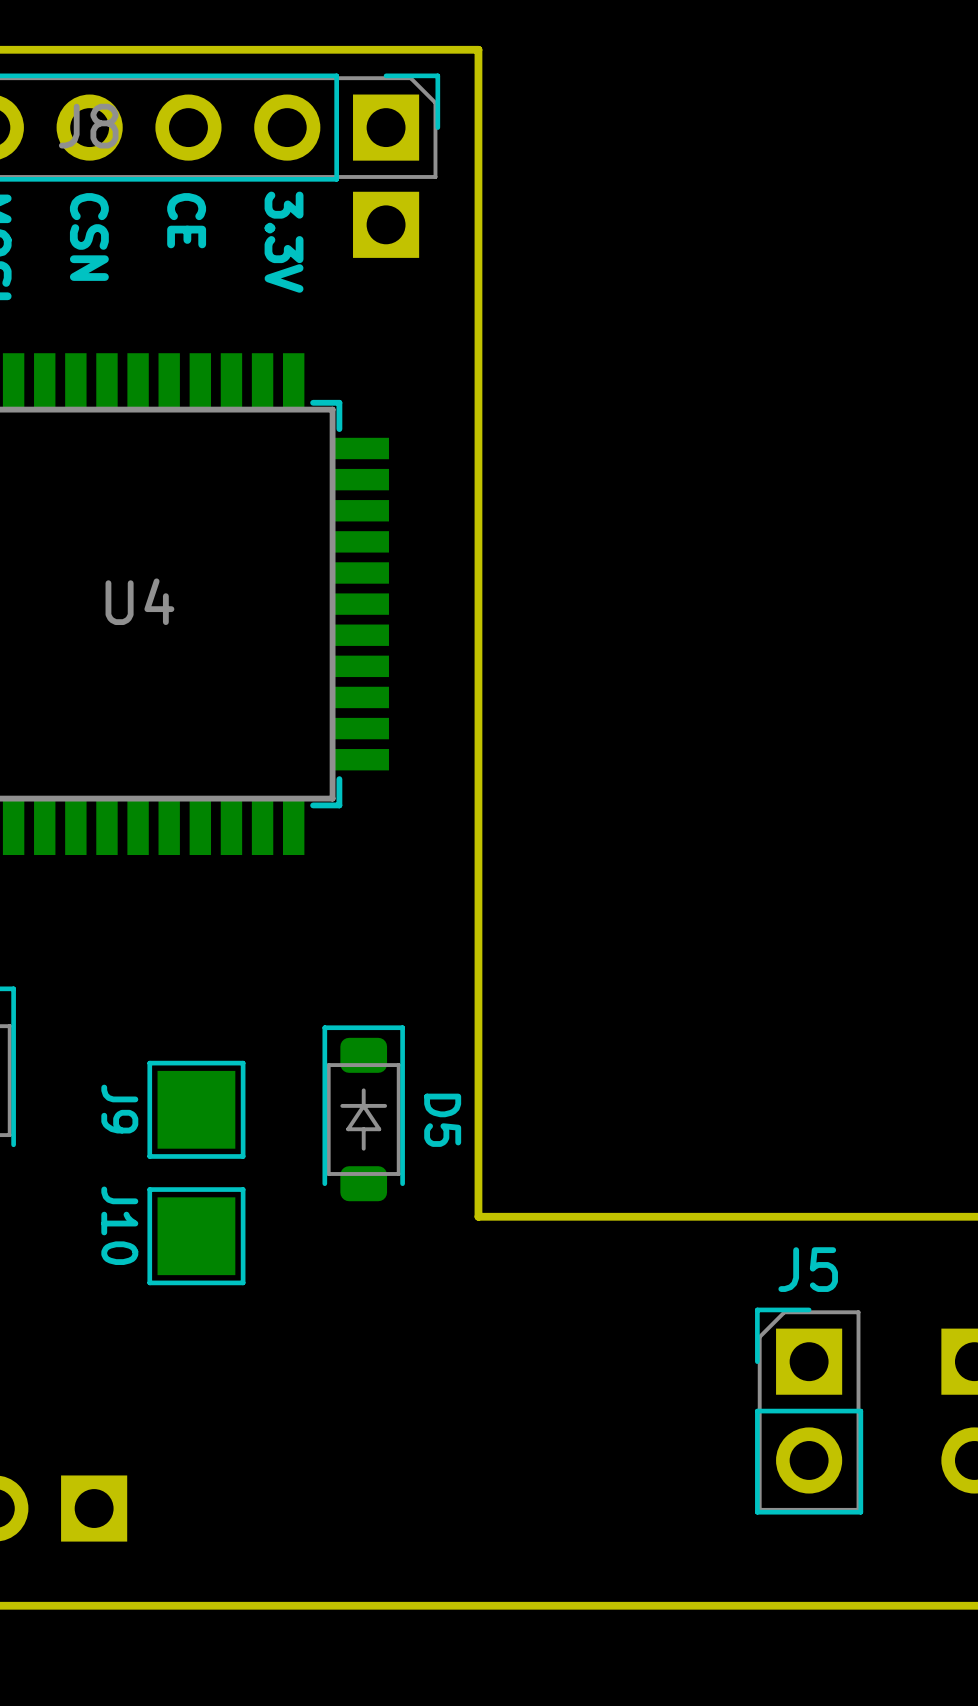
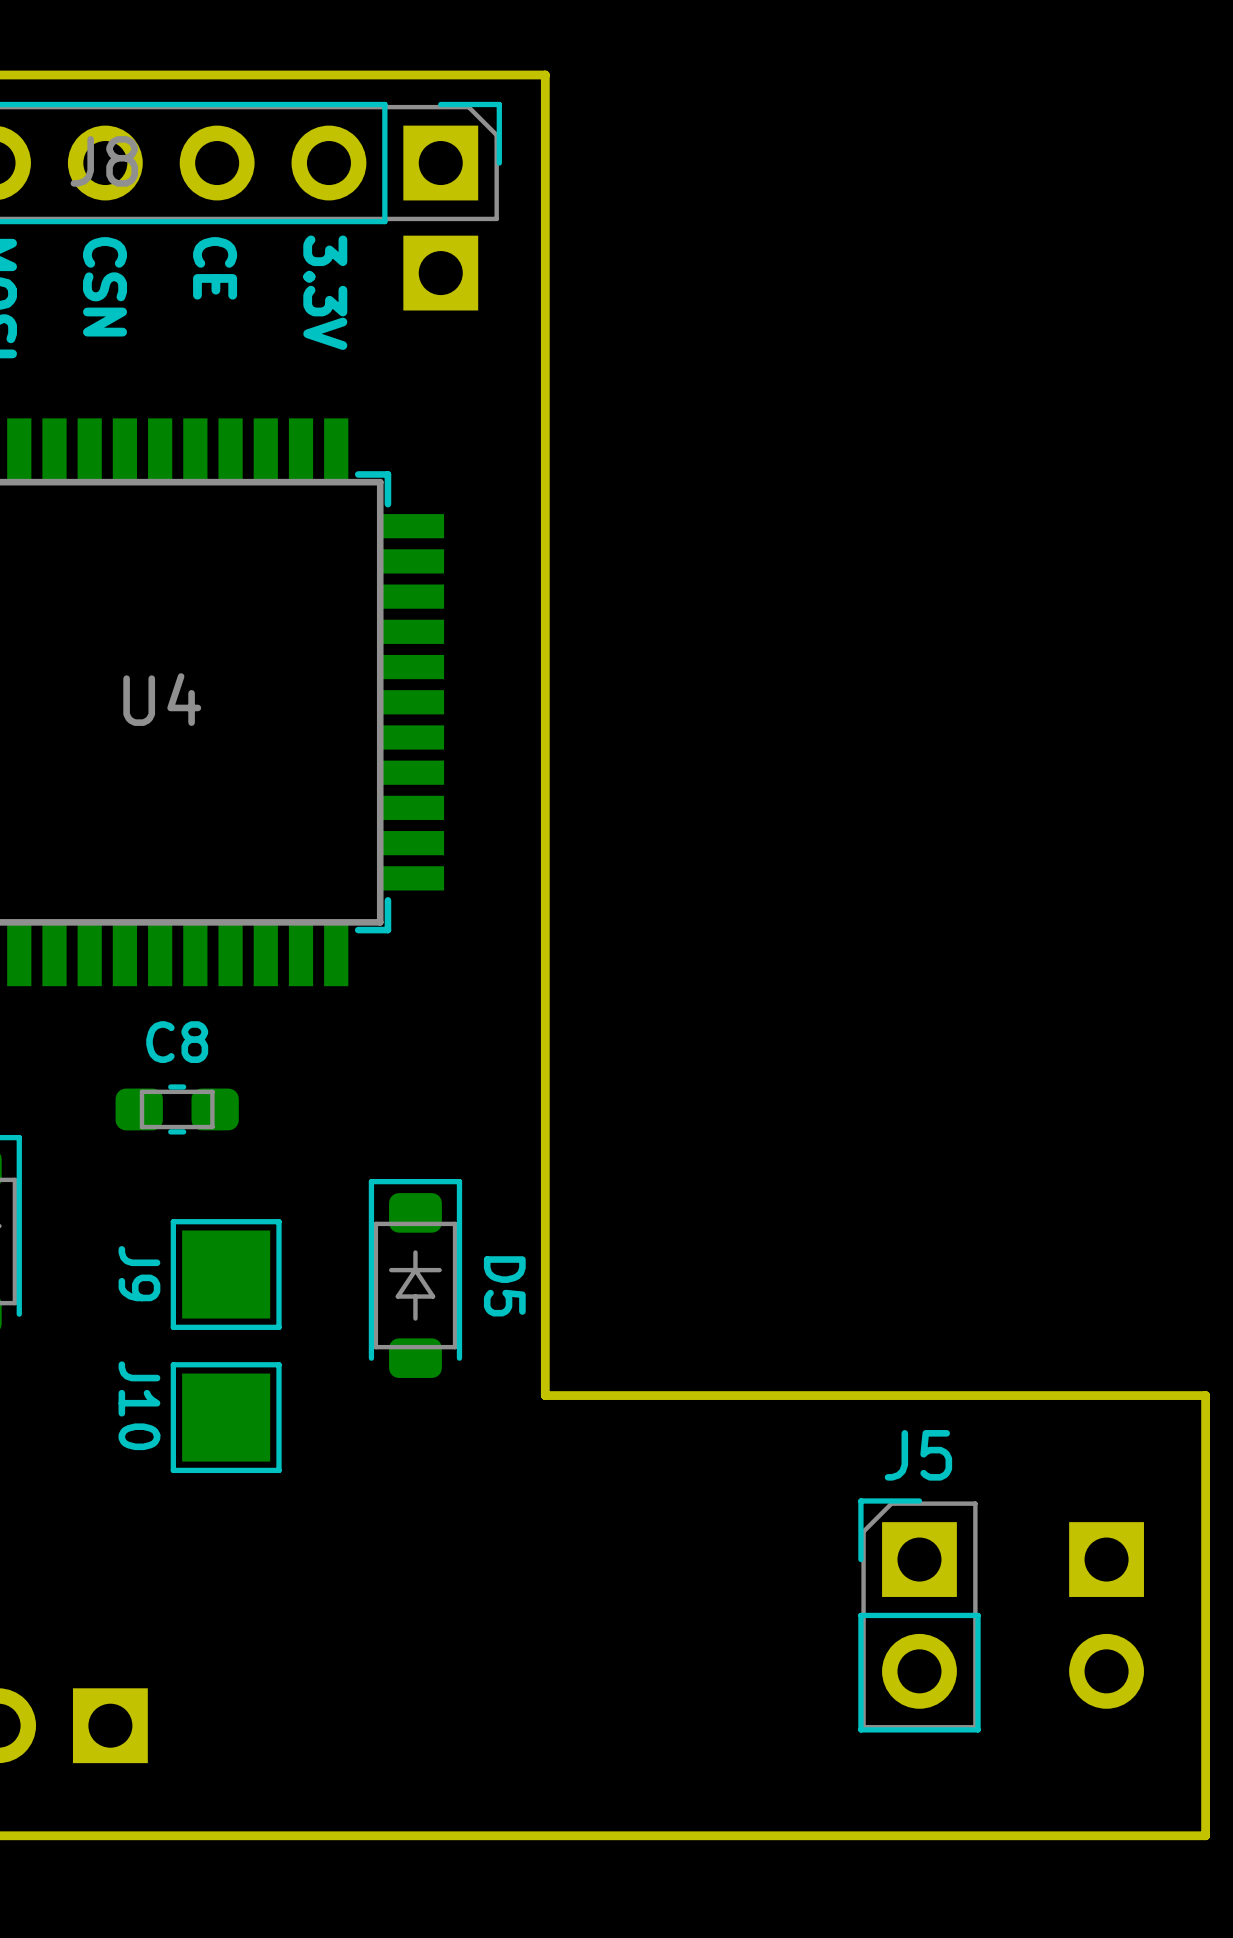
C8: none -> (177, 1109)

